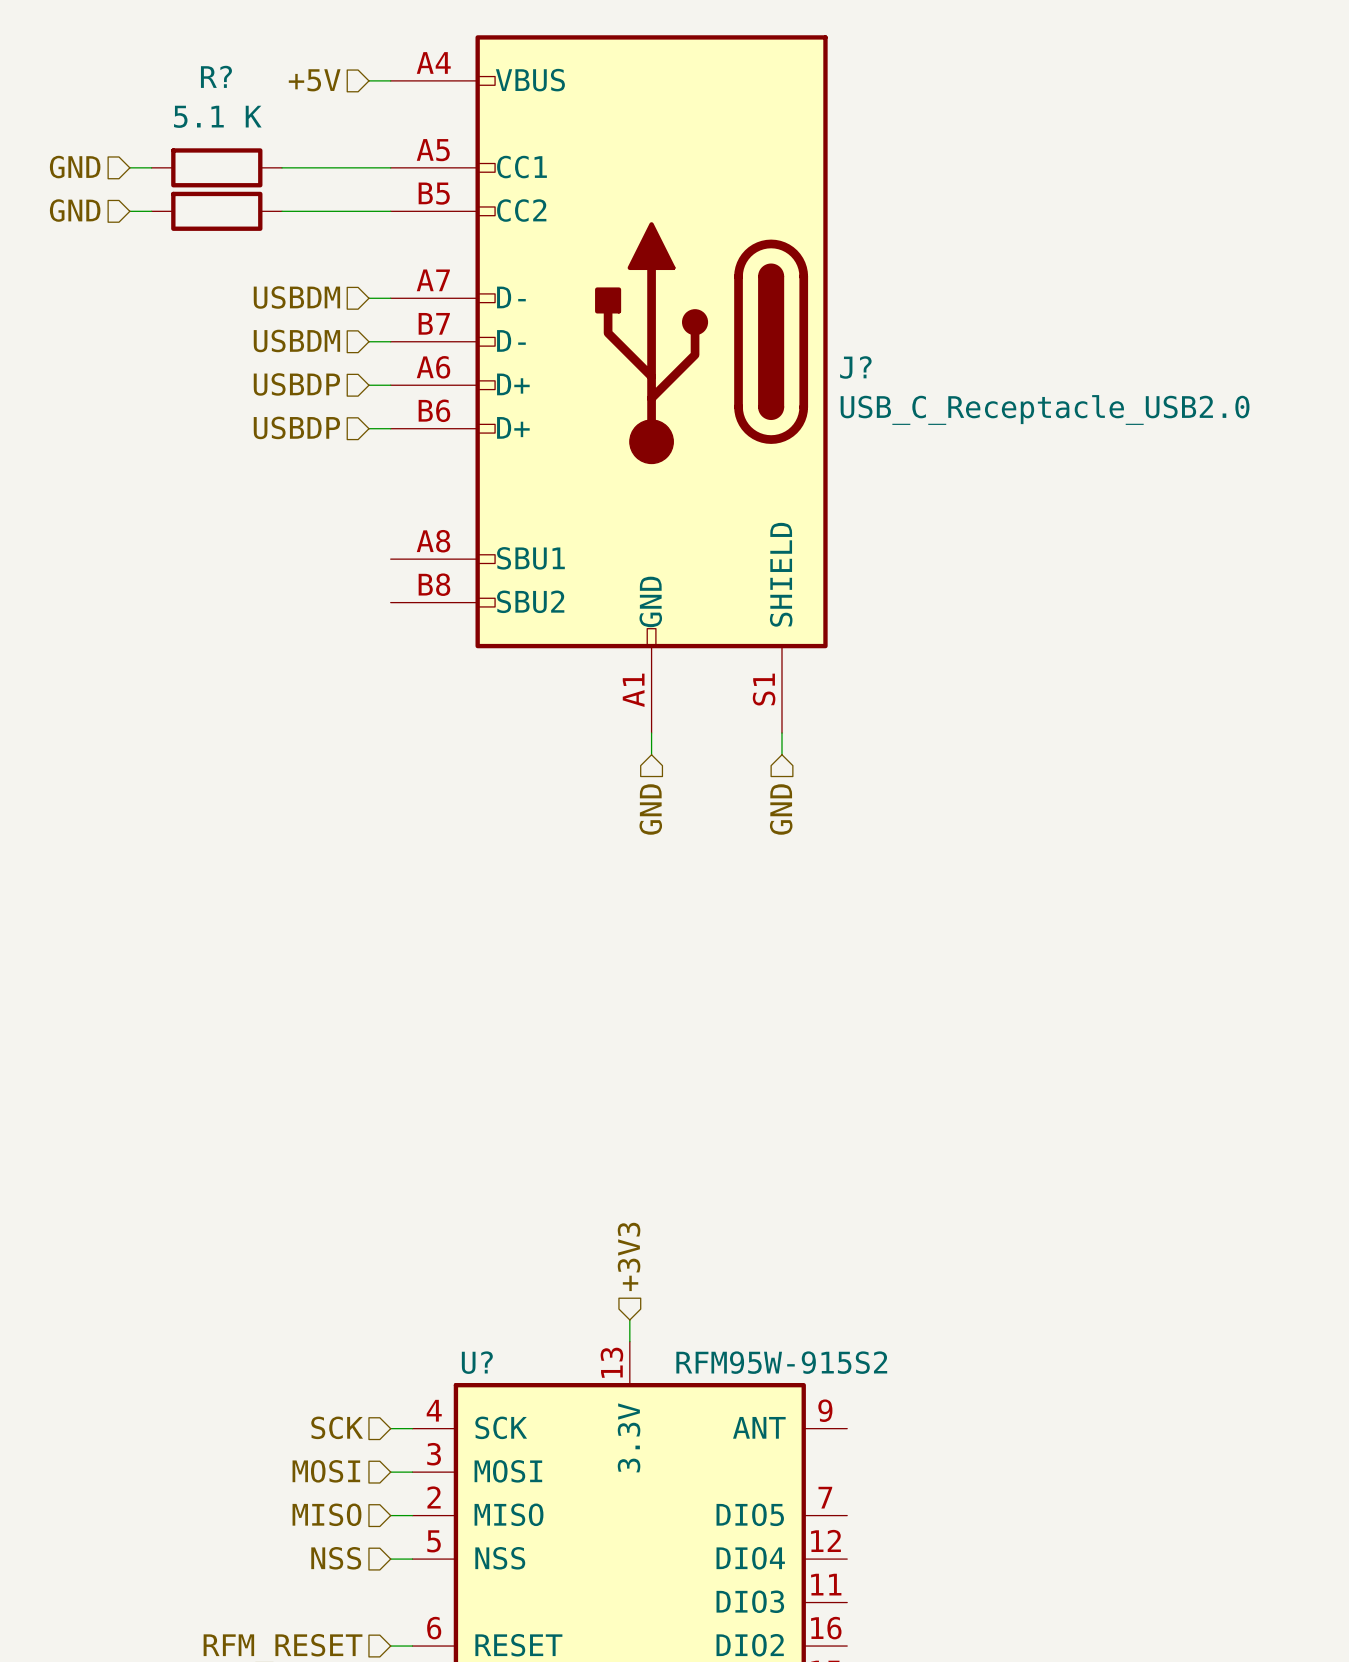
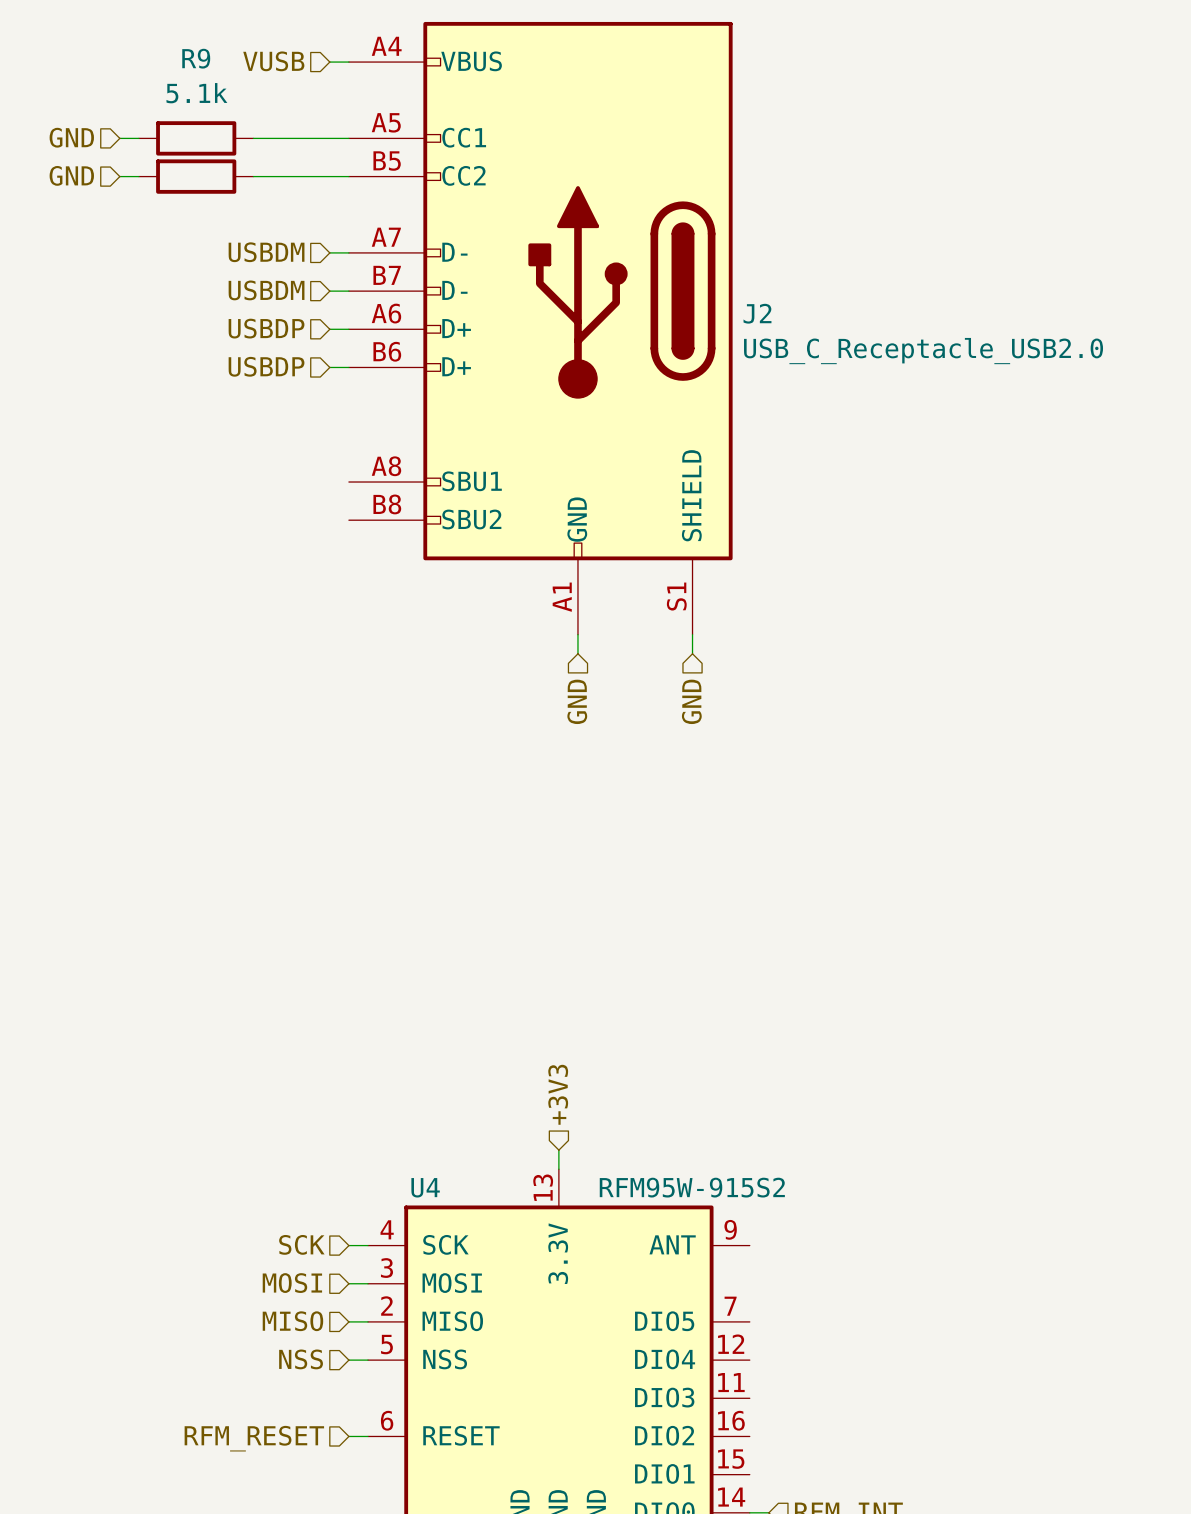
R? name: R? (216, 76) -> R9 (196, 58)
hierarchical label: +5V (314, 80) -> VUSB (273, 61)
R? value: 5.1 K (217, 116) -> 5.1k (196, 93)
J? name: J? (855, 367) -> J2 (757, 313)
U? name: U? (477, 1362) -> U4 (425, 1187)

